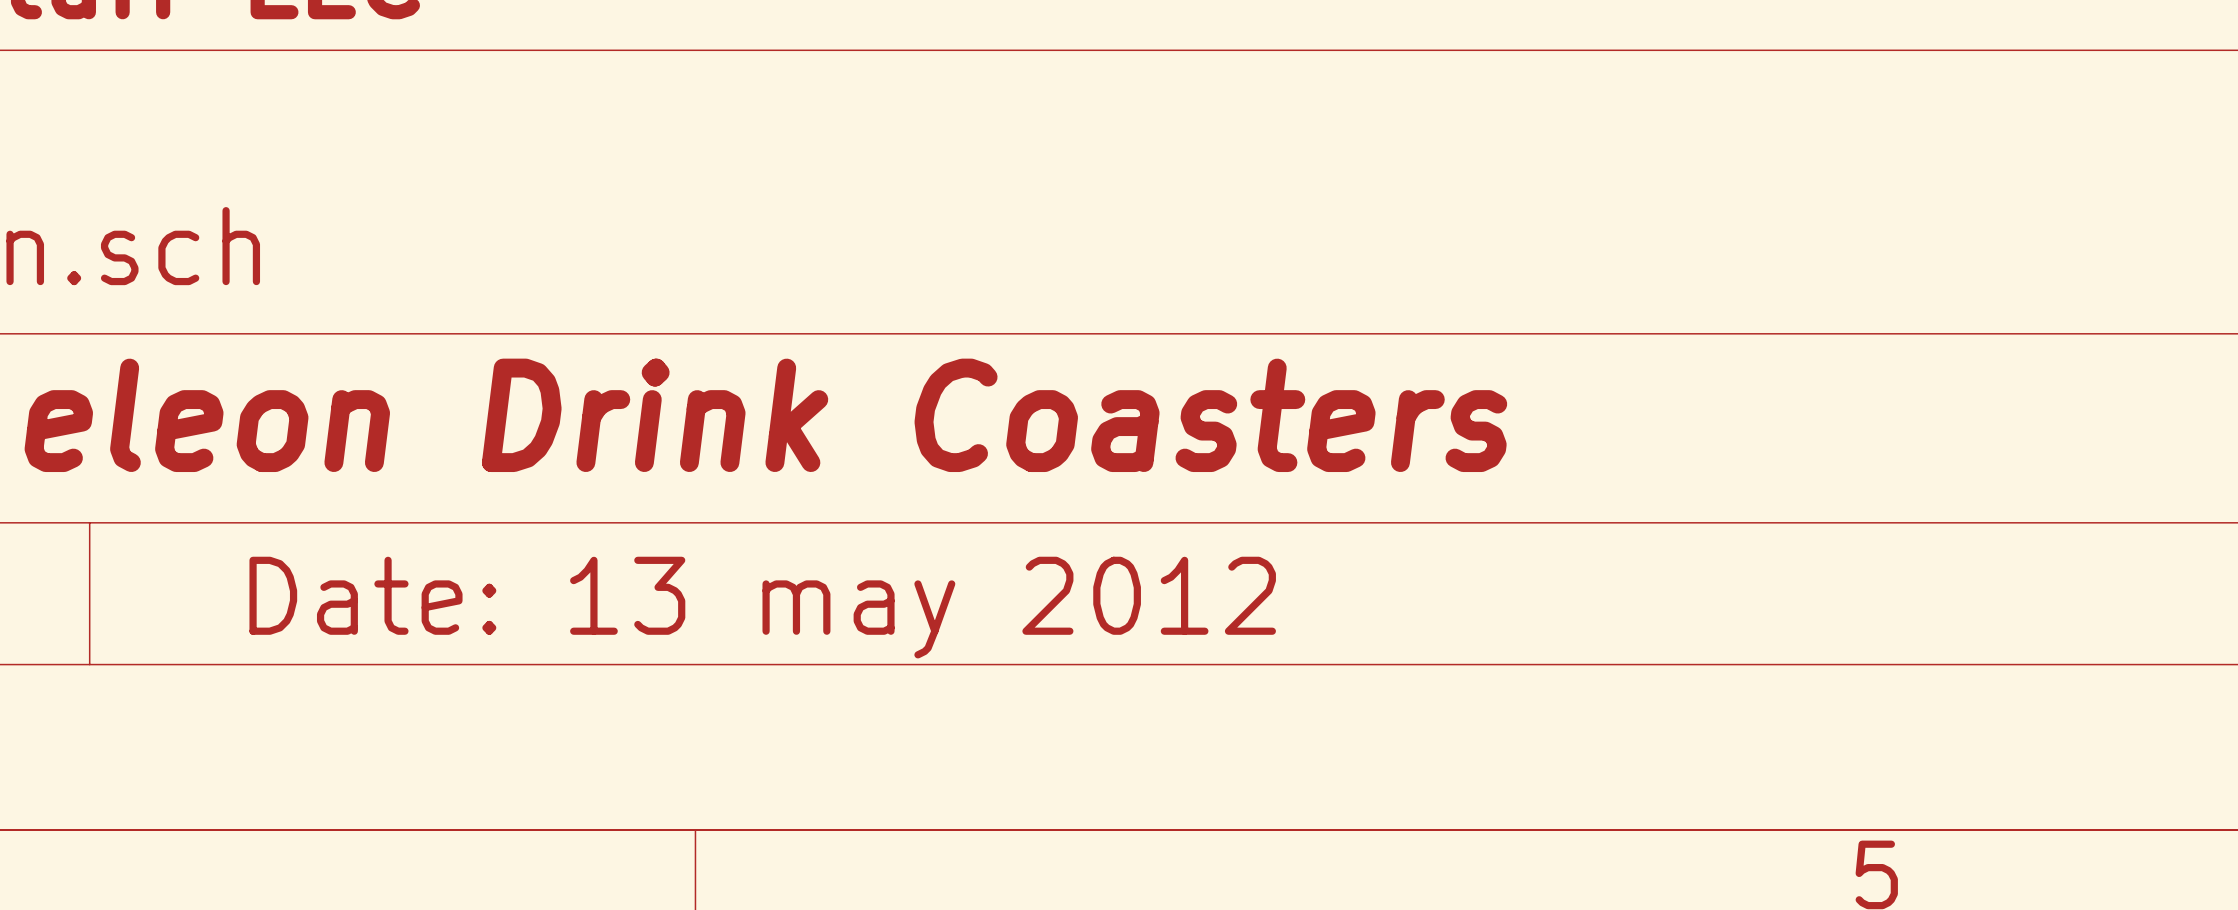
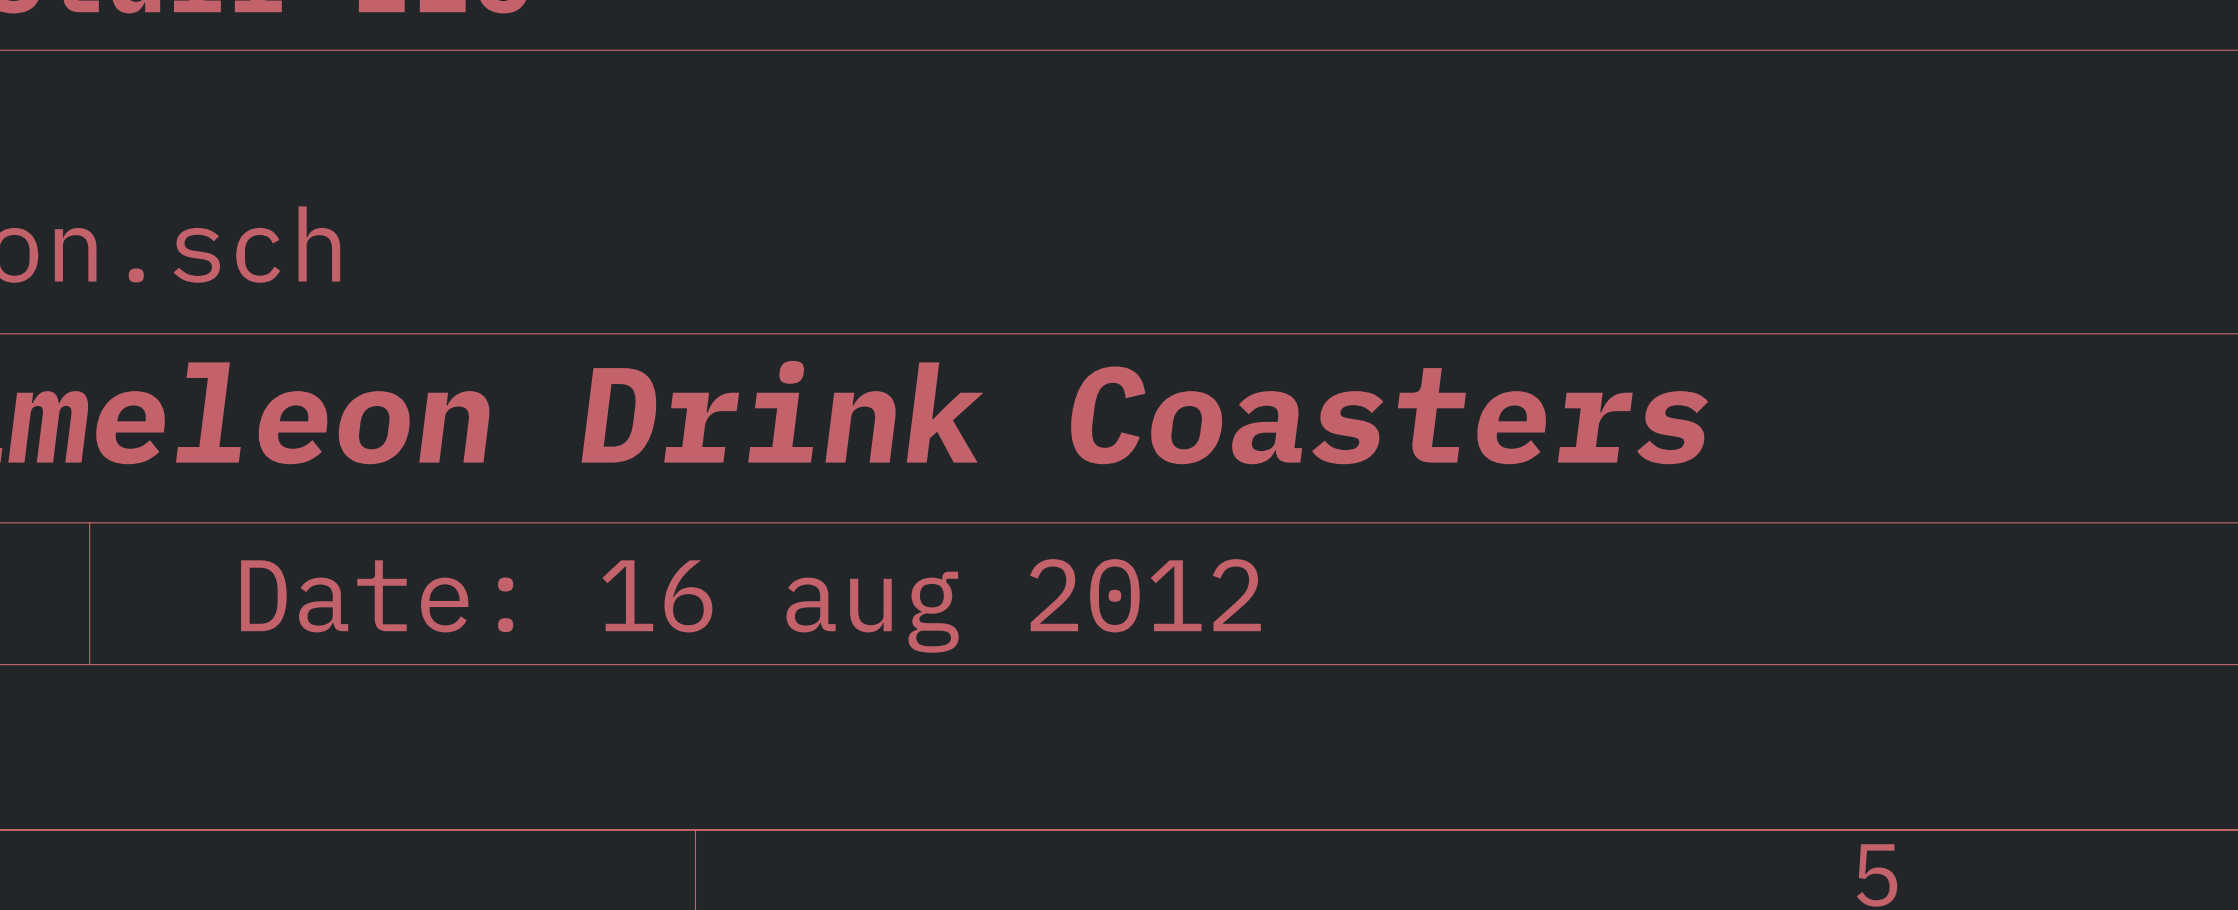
title block: Date: 13 may 2012 (762, 607) -> Date: 16 aug 2012 (750, 605)

